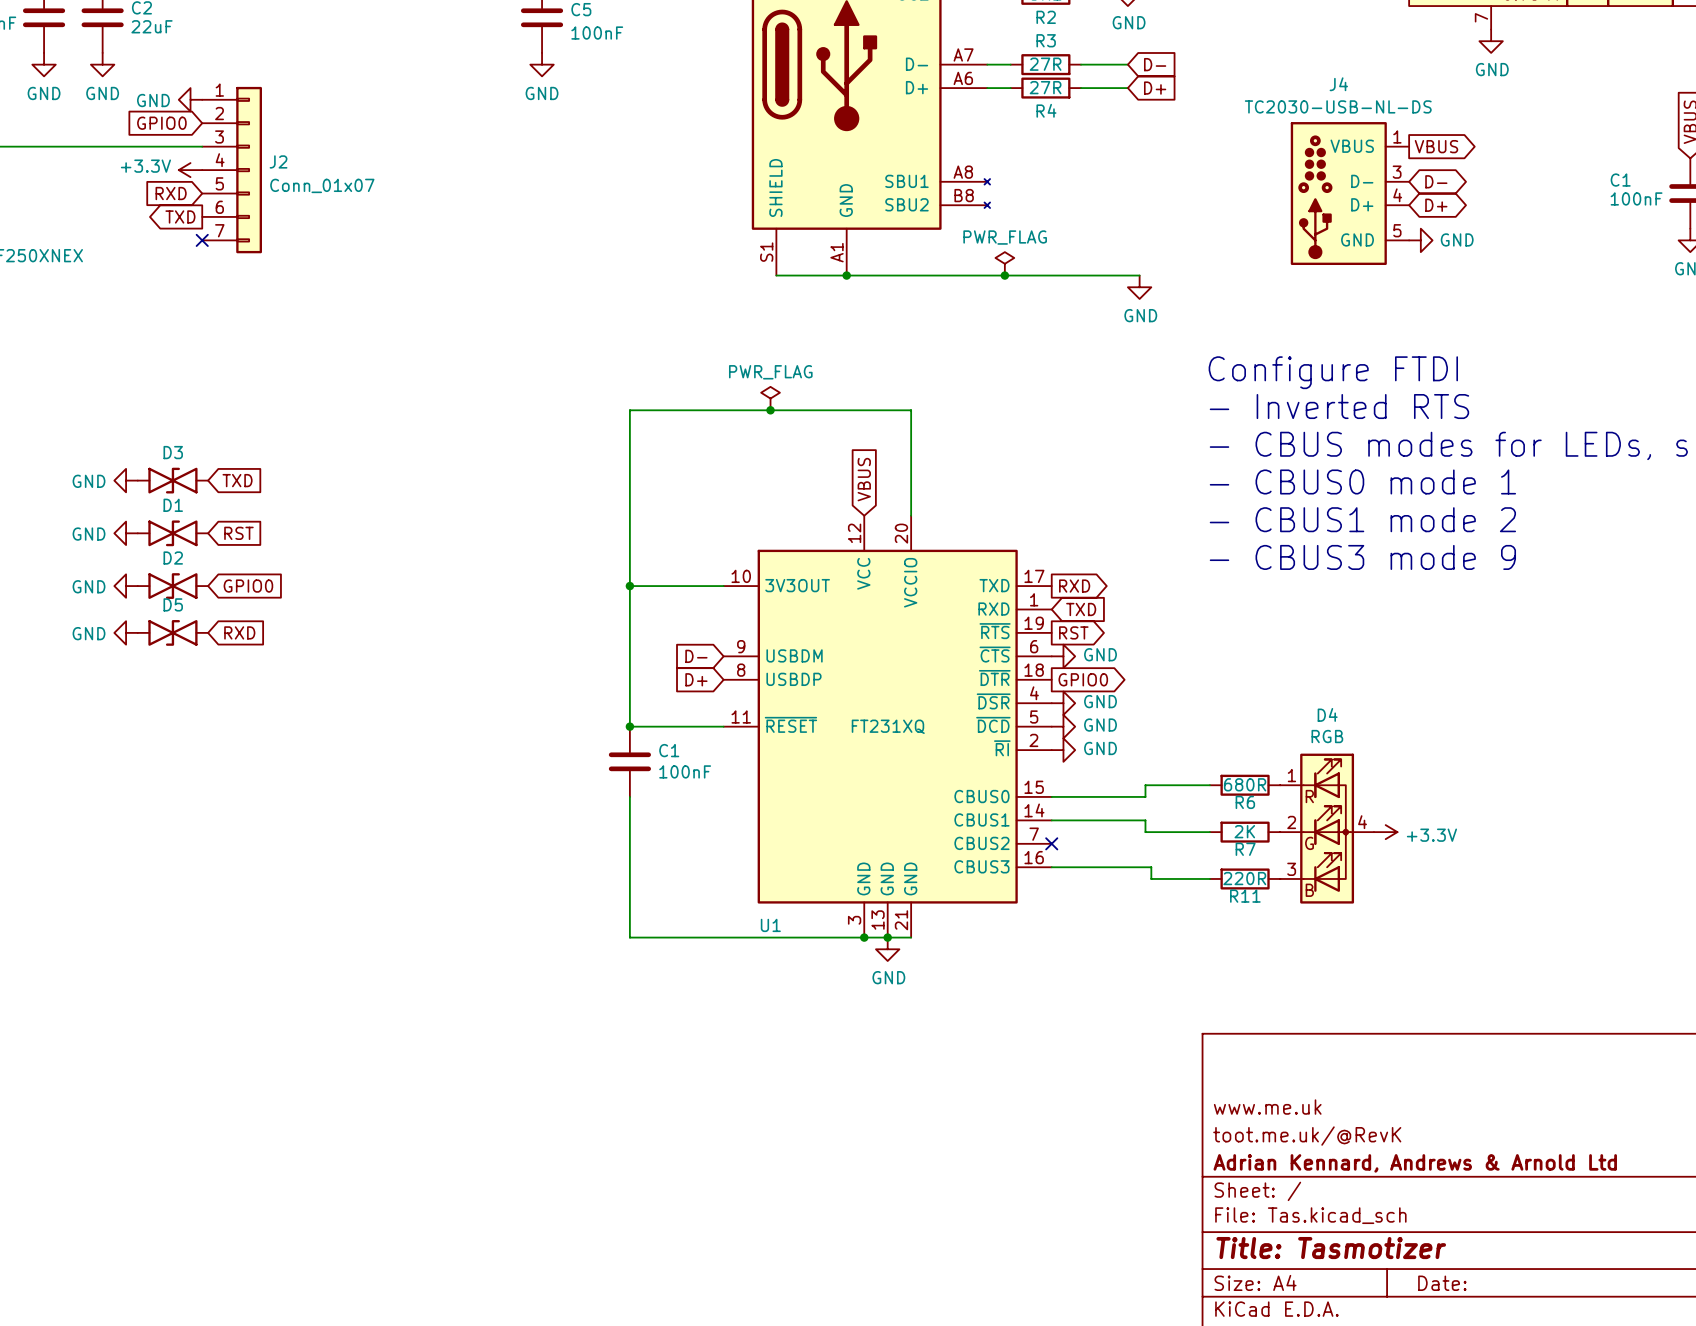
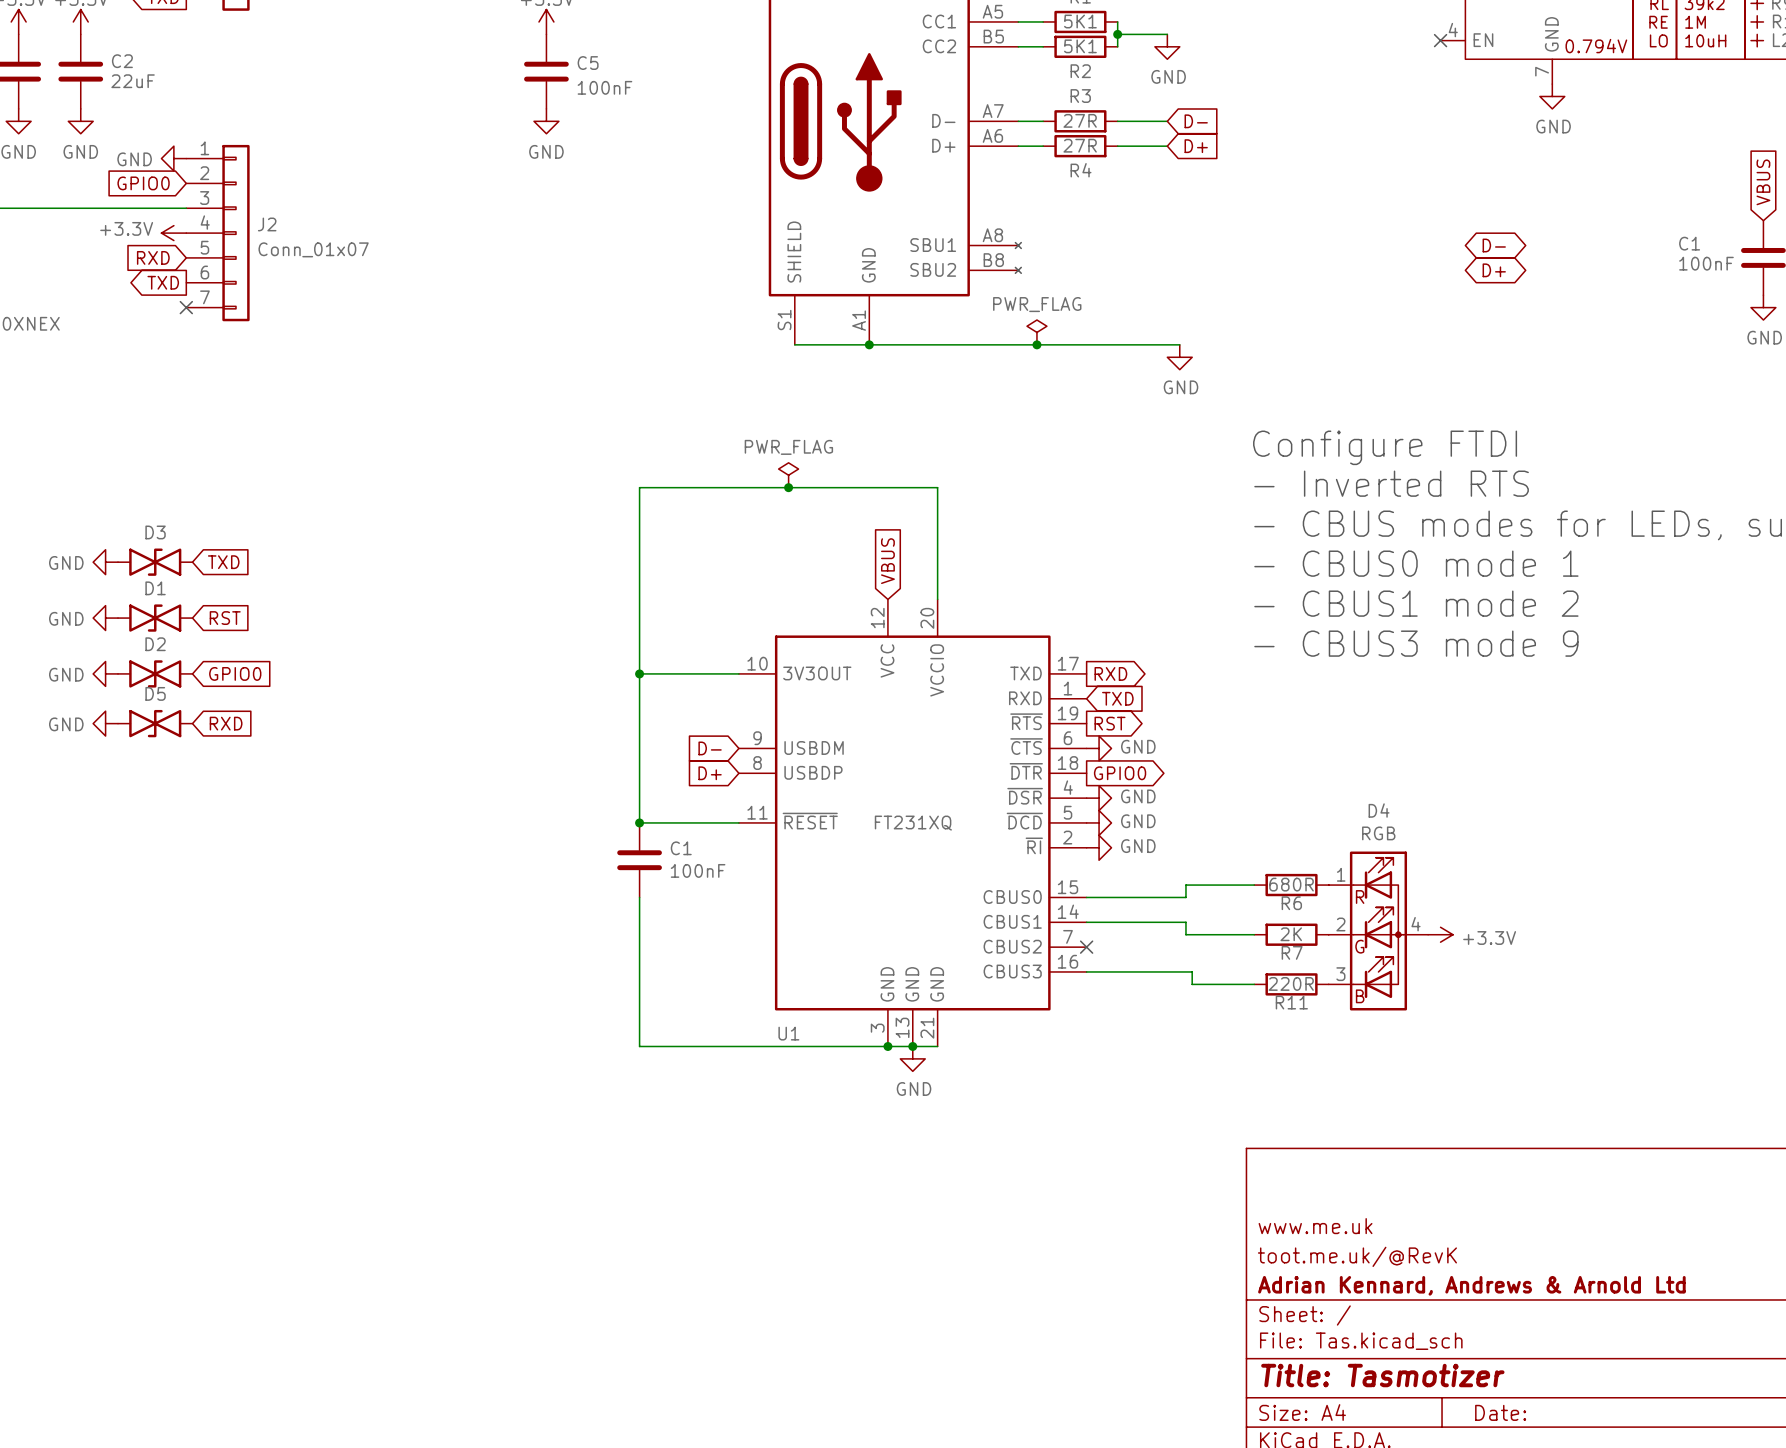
global label: VBUS (1436, 146) -> none
J4: TC2030-USB-NL-DS (1349, 193) -> none
power symbol: GND (1420, 240) -> none

